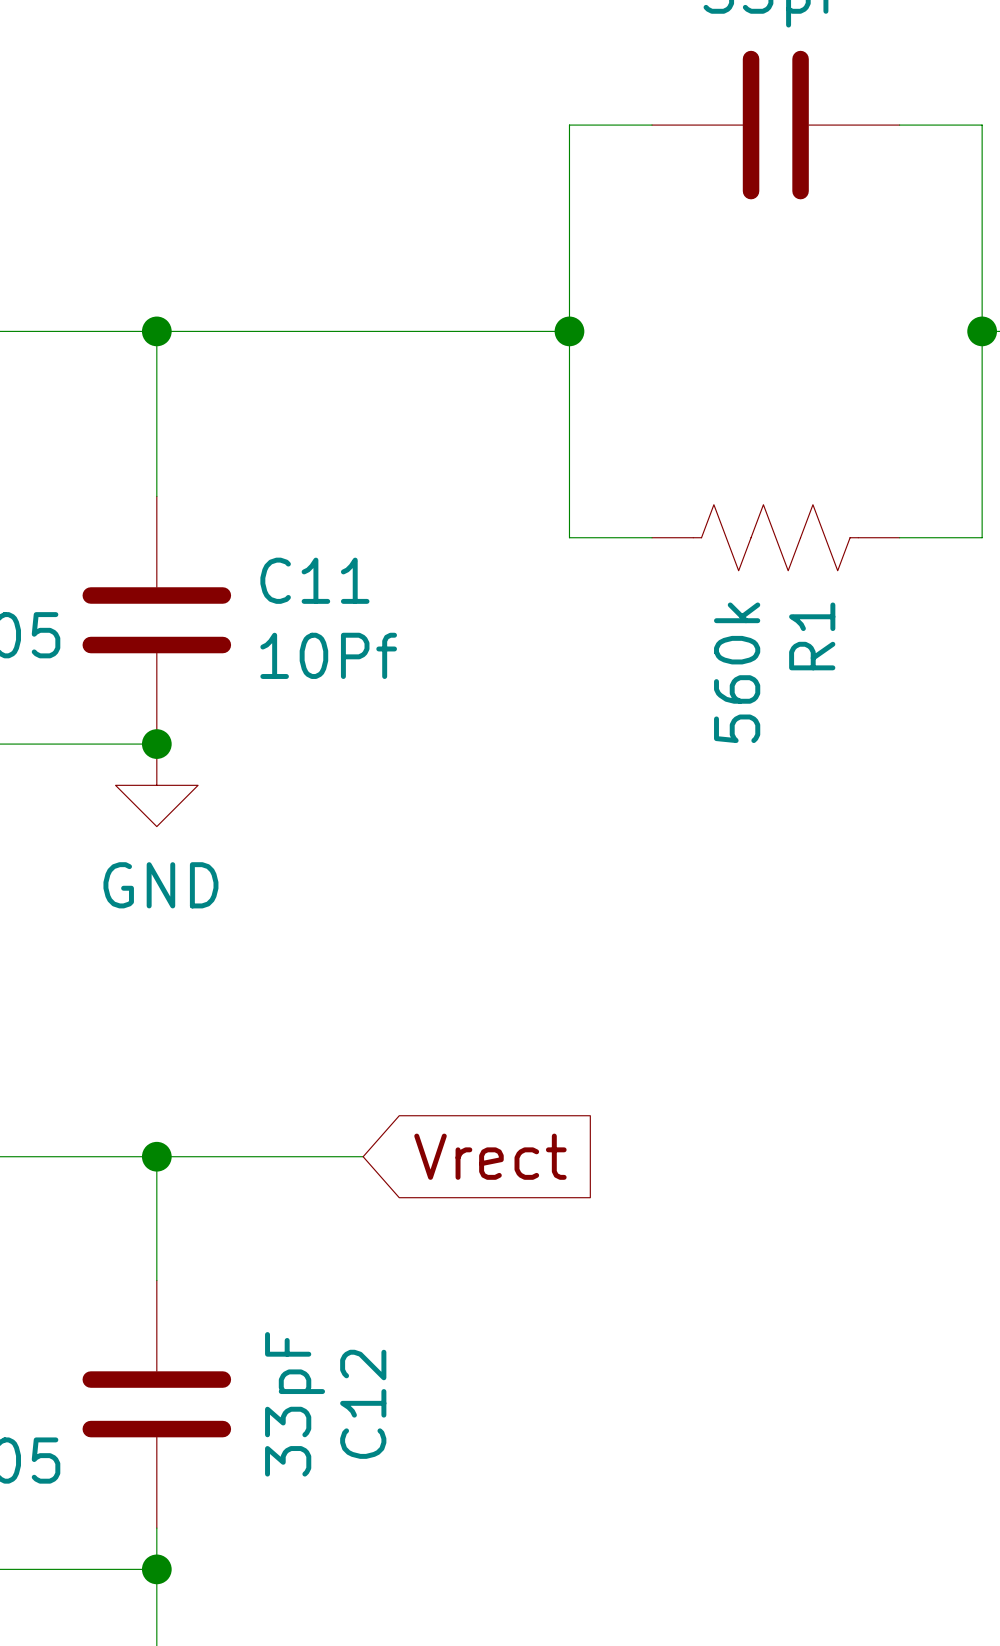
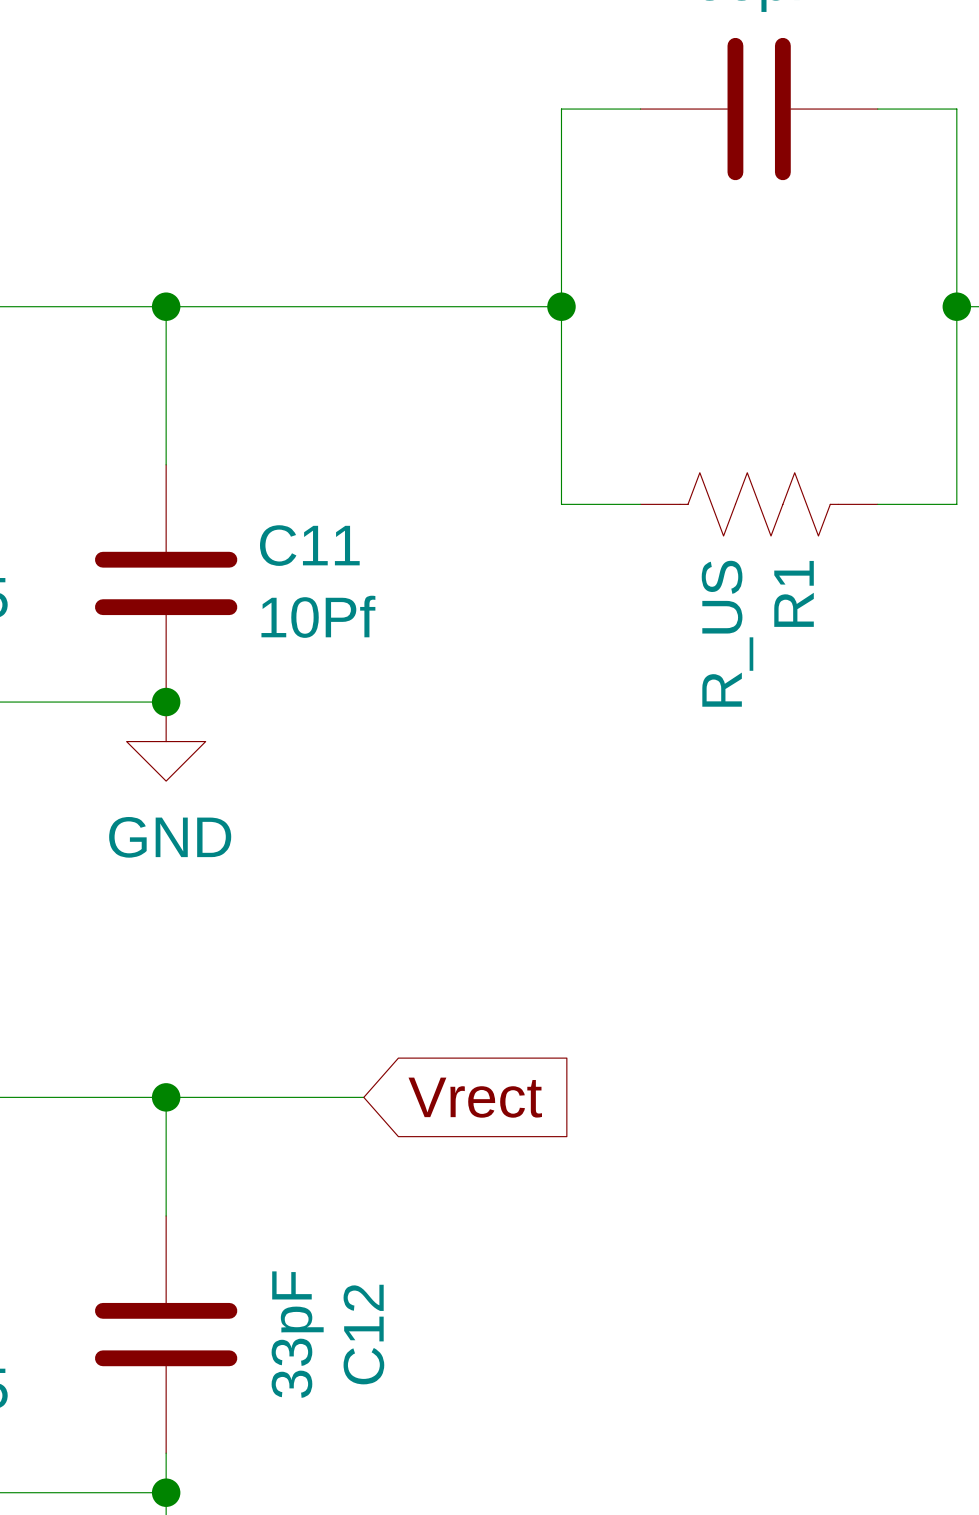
R1 value: 560k (737, 672) -> R_US (727, 633)

